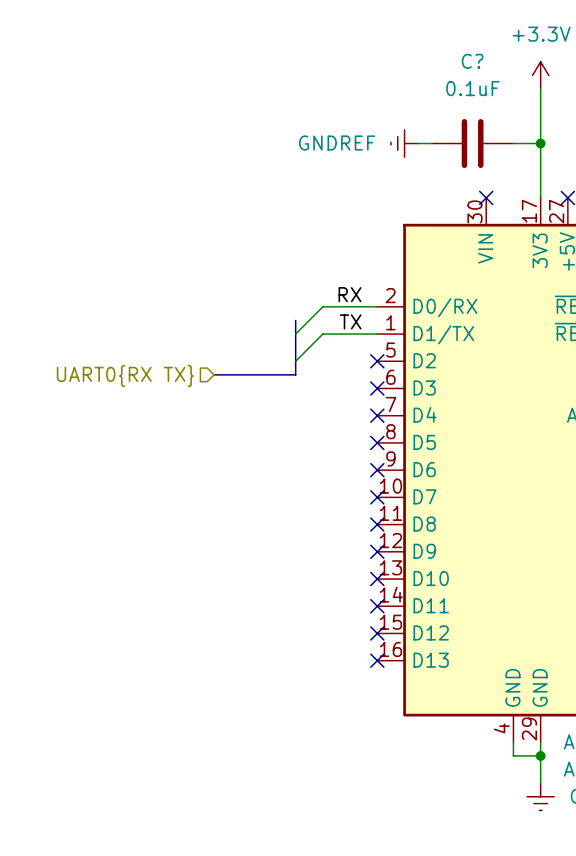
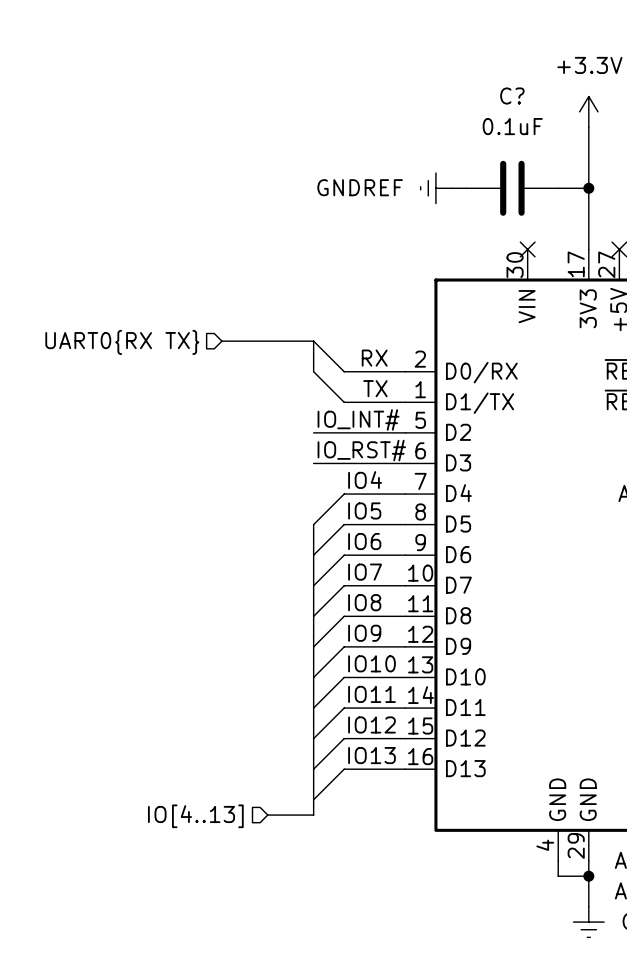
bus: none -> (221, 341) (313, 341) (313, 371)
wire: (322, 306) (295, 334) -> (344, 371) (313, 341)
bus: (295, 320) (295, 374) (214, 374) -> none
wire: (322, 334) (295, 361) -> (344, 402) (313, 371)
label: none -> IO_INT# (358, 419)
wire: none -> (313, 432) (405, 432)
no-connect mark: (377, 361) -> none
hierarchical label position: UART0{RX TX} (125, 375) -> UART0{RX TX} (122, 342)
label: none -> IO_RST# (361, 450)
wire: none -> (313, 463) (405, 463)
no-connect mark: (377, 388) -> none
label: none -> IO4 (365, 480)
wire: none -> (405, 494) (344, 494) (313, 524)
no-connect mark: (377, 415) -> none
label: none -> IO5 (364, 510)
bus: none -> (313, 524) (313, 815) (267, 815)
wire: none -> (405, 524) (344, 524) (313, 555)
no-connect mark: (377, 442) -> none
label: none -> IO6 (364, 541)
wire: none -> (405, 555) (344, 555) (313, 585)
no-connect mark: (377, 470) -> none
label: none -> IO7 (365, 572)
wire: none -> (405, 585) (344, 585) (313, 616)
no-connect mark: (377, 497) -> none
label: none -> IO8 (364, 602)
wire: none -> (405, 616) (344, 616) (313, 646)
no-connect mark: (377, 524) -> none
label: none -> IO9 (364, 633)
wire: none -> (405, 646) (344, 646) (313, 677)
no-connect mark: (377, 551) -> none
label: none -> IO10 (372, 663)
wire: none -> (405, 677) (344, 677) (313, 708)
no-connect mark: (377, 579) -> none
label: none -> IO11 (372, 694)
wire: none -> (405, 708) (344, 708) (313, 738)
no-connect mark: (377, 606) -> none
label: none -> IO12 (372, 724)
wire: none -> (405, 738) (344, 738) (313, 769)
no-connect mark: (377, 633) -> none
label: none -> IO13 (372, 755)
wire: none -> (405, 769) (344, 769) (313, 799)
no-connect mark: (377, 660) -> none
hierarchical label: none -> IO[4..13] (195, 816)

